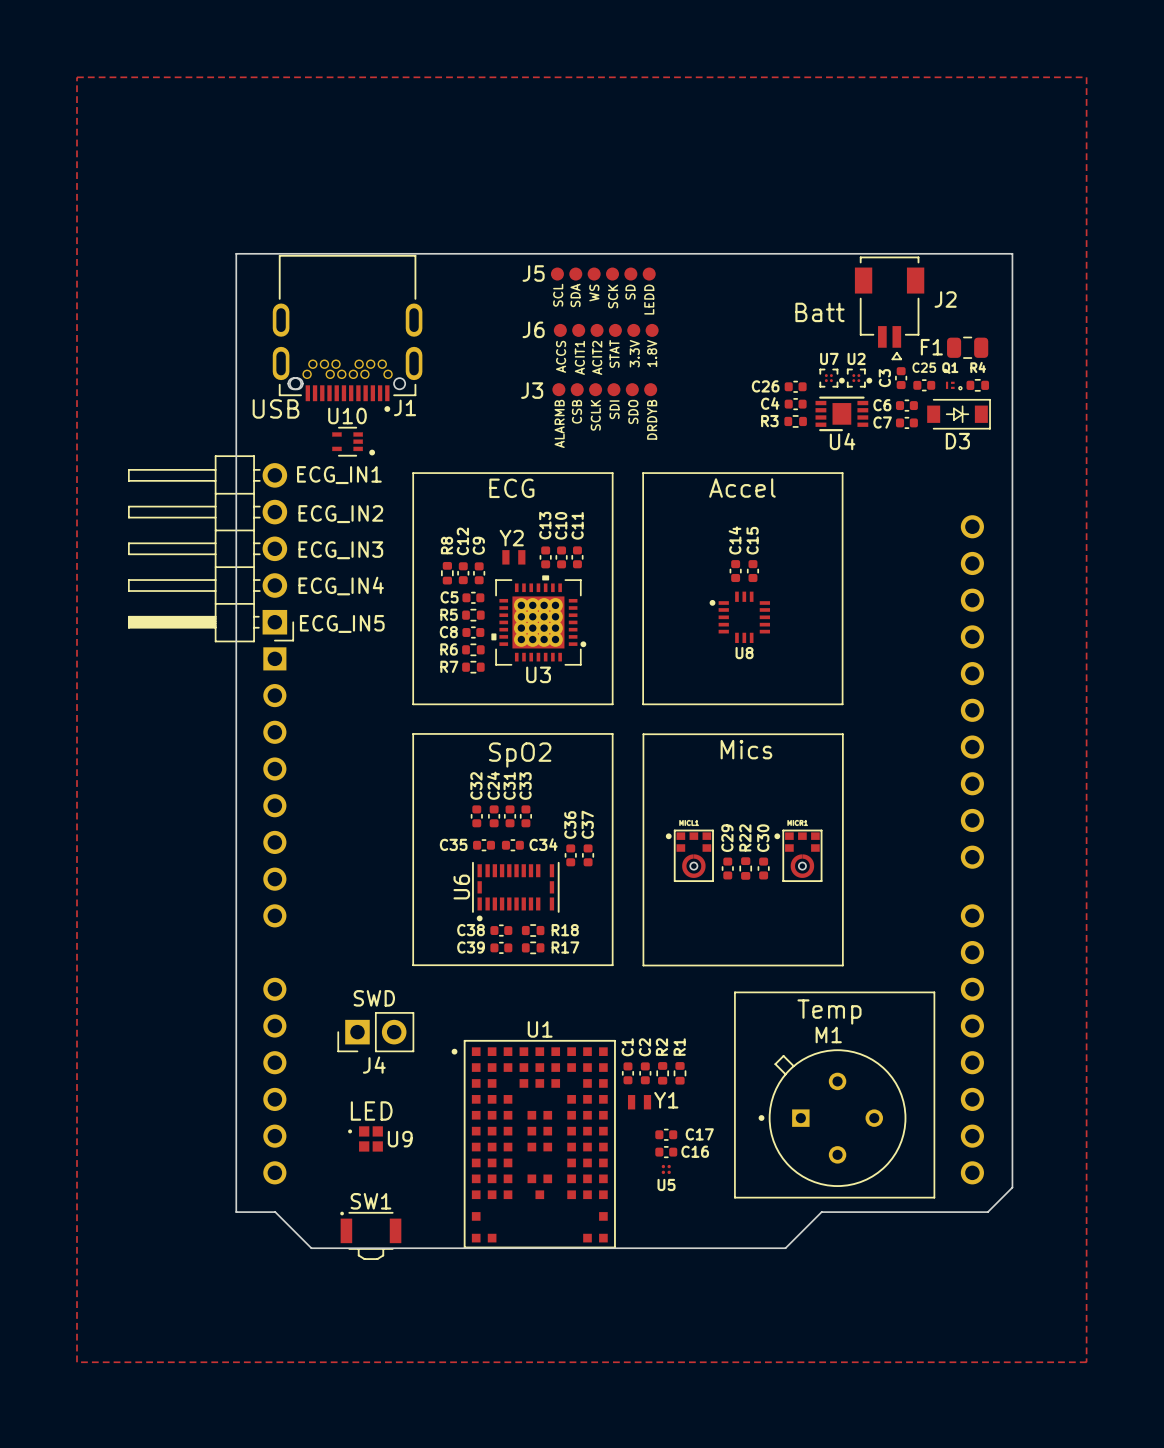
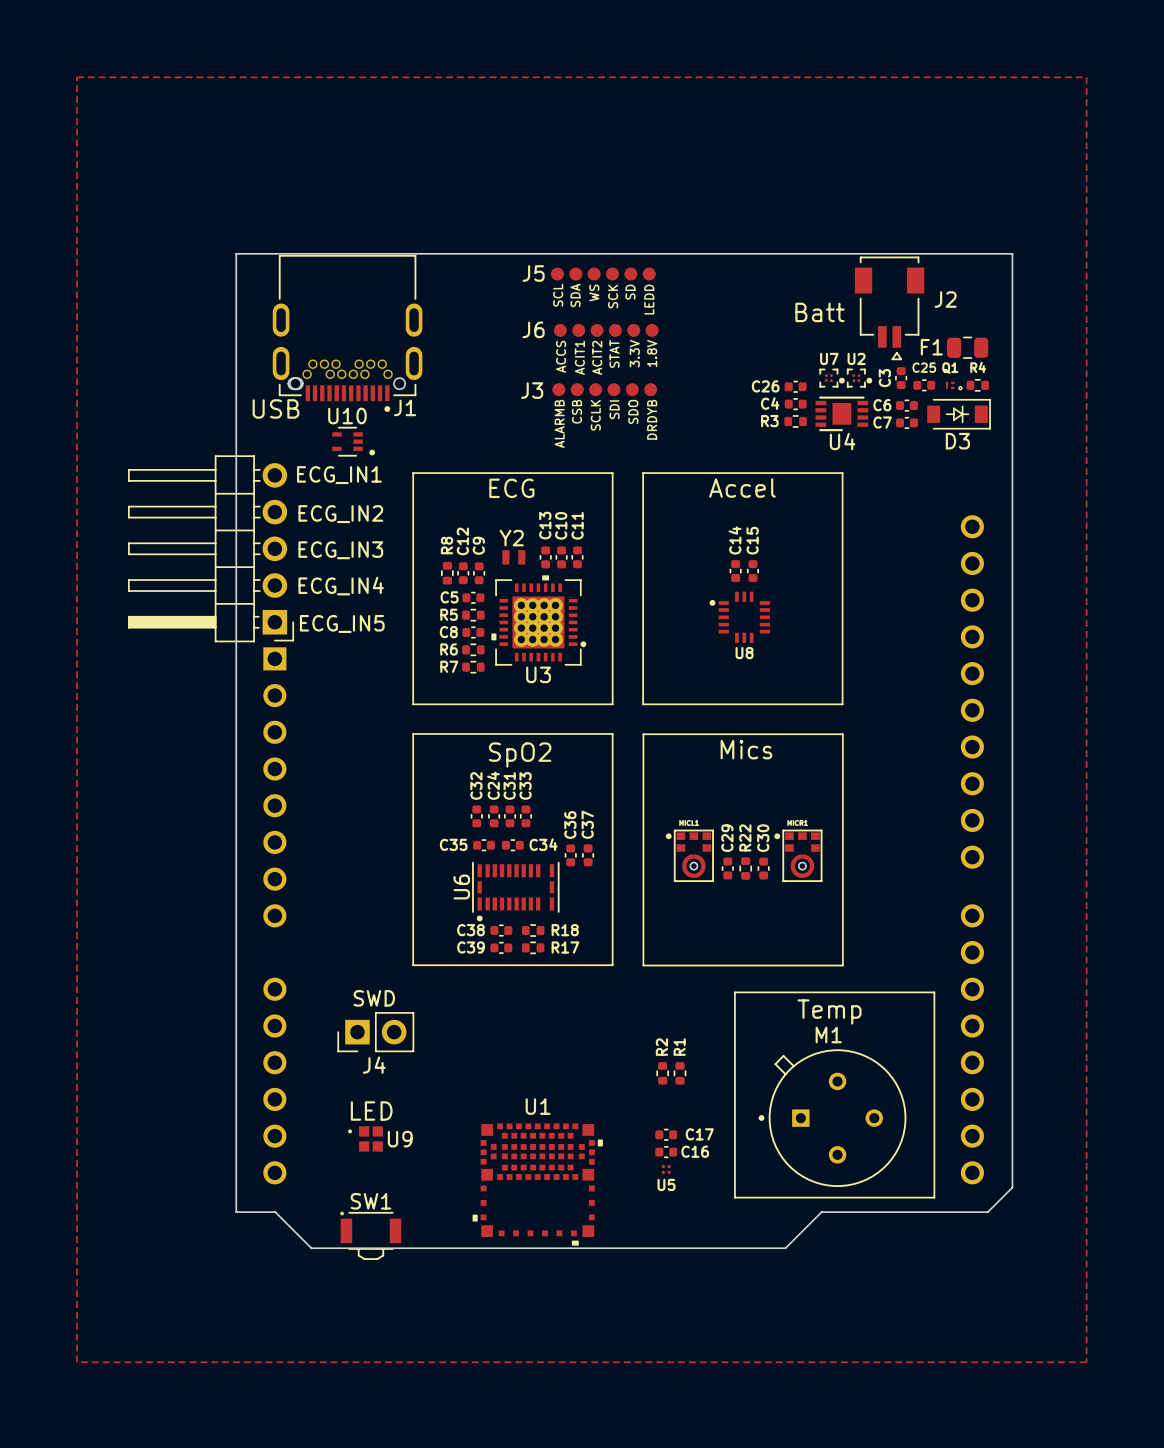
U1 name position: U1 (540, 1029) -> U1 (538, 1106)
U1 footprint: [451, 1039, 616, 1249] -> [472, 1123, 603, 1246]
C1: (627, 1073) -> none
C2: (645, 1073) -> none
Y1: (639, 1102) -> none

